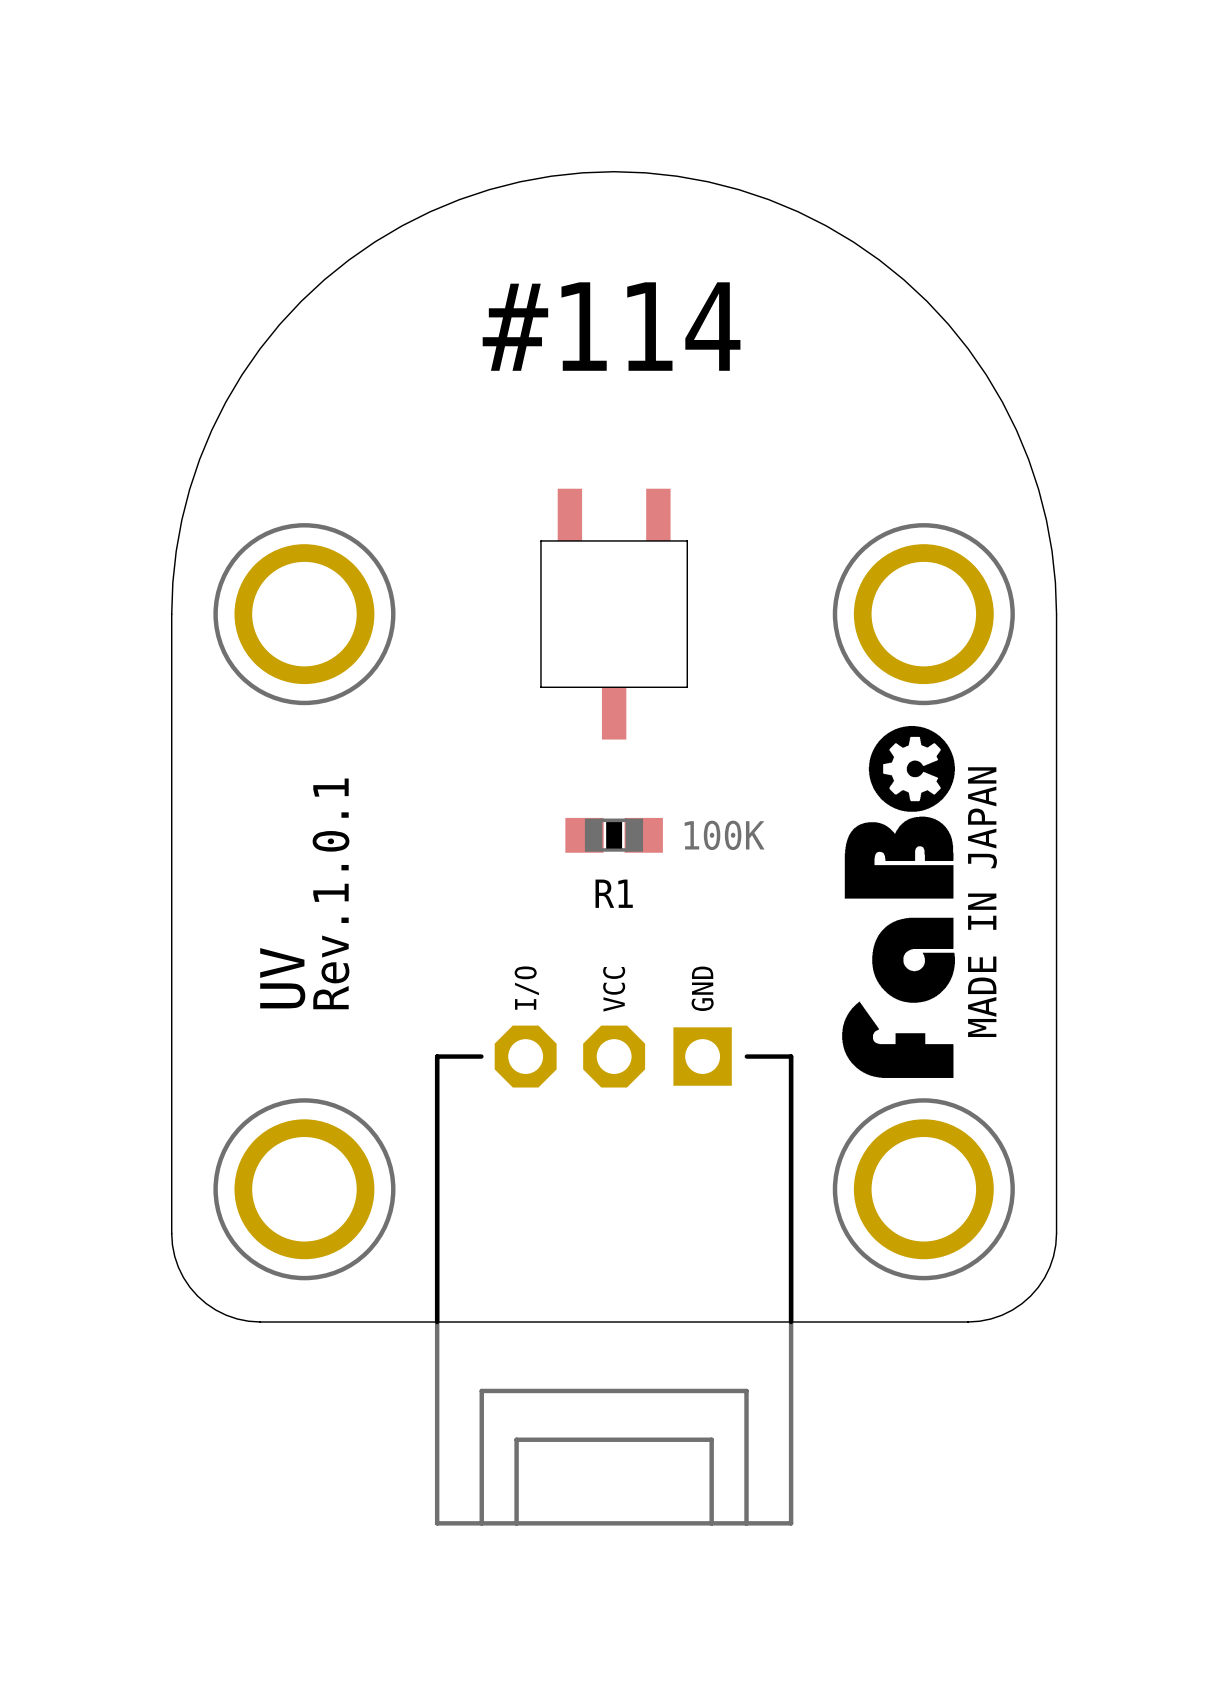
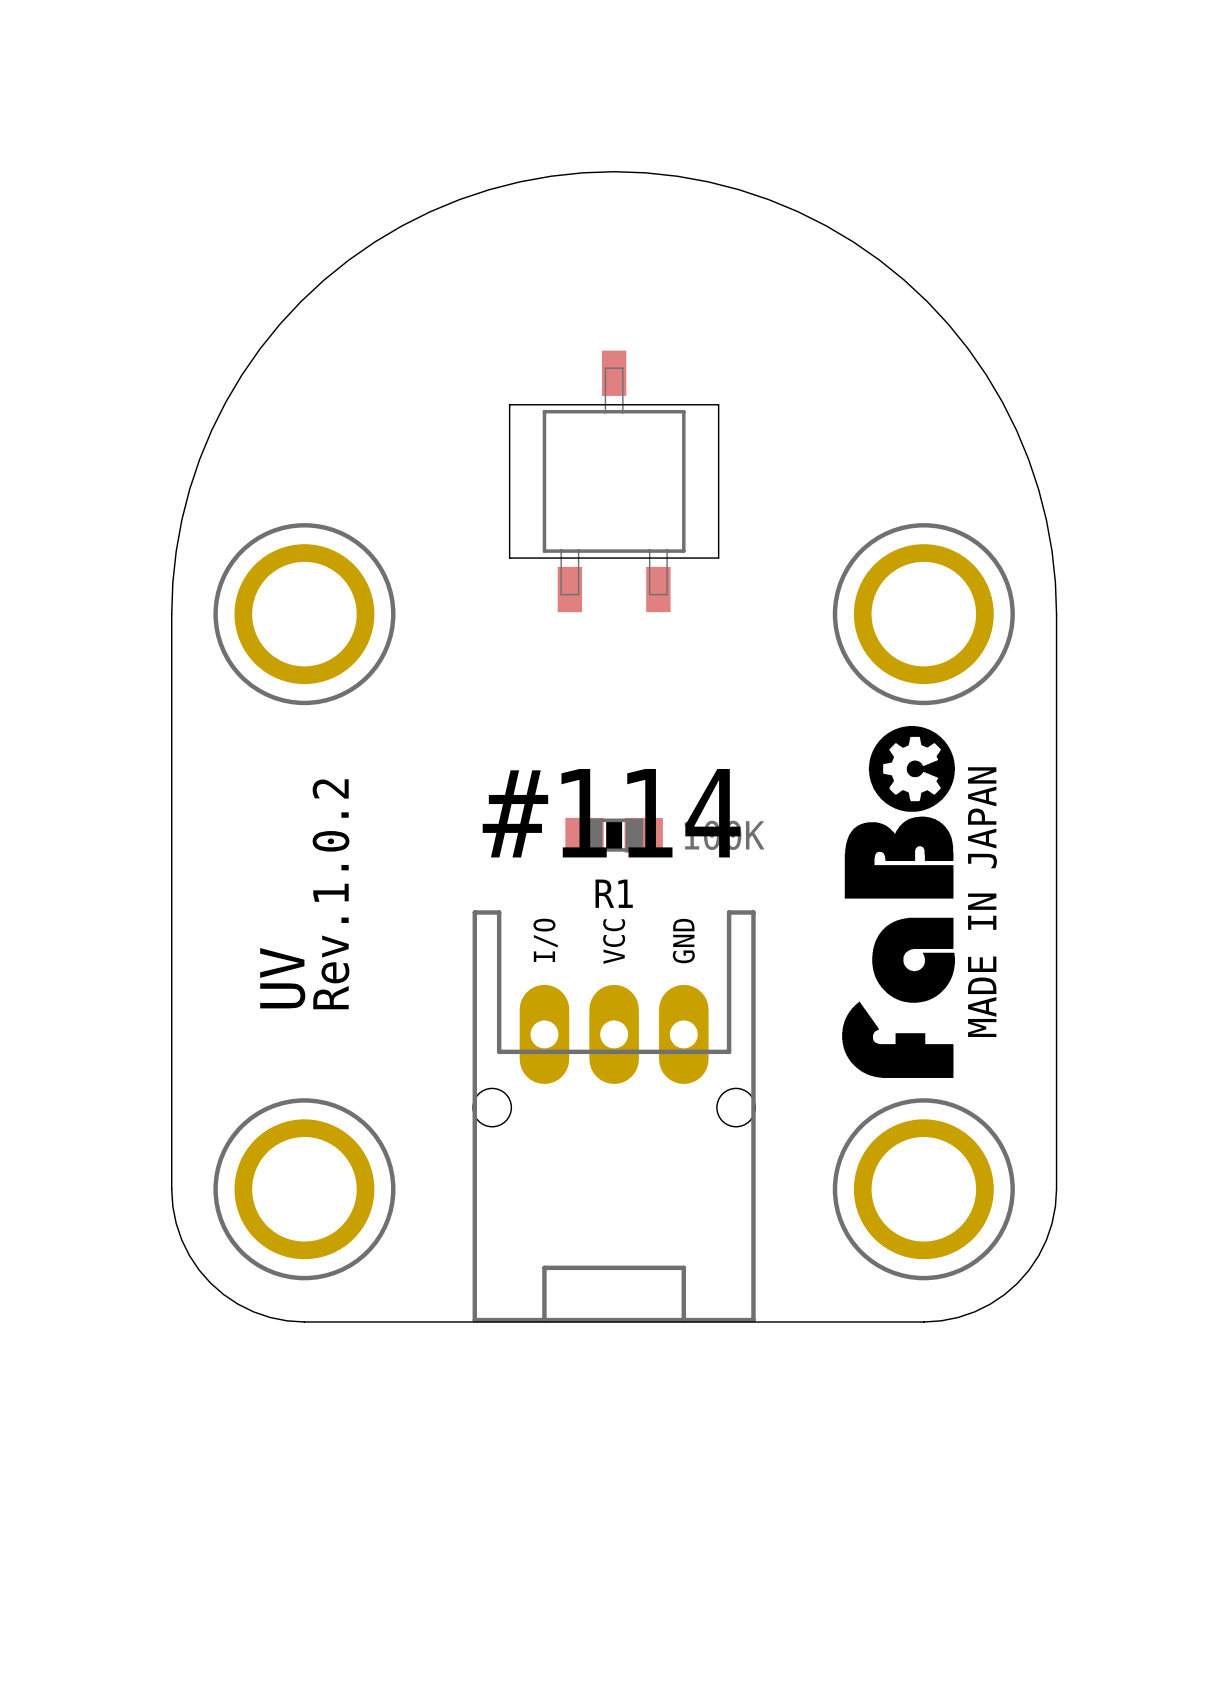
text position: #114 (611, 326) -> #114 (611, 813)
part: none -> (614, 481)
part: (614, 614) -> none
part: none -> (614, 747)
part: (614, 848) -> none
text: Rev.1.0.1 (331, 893) -> Rev.1.0.2 (331, 894)

